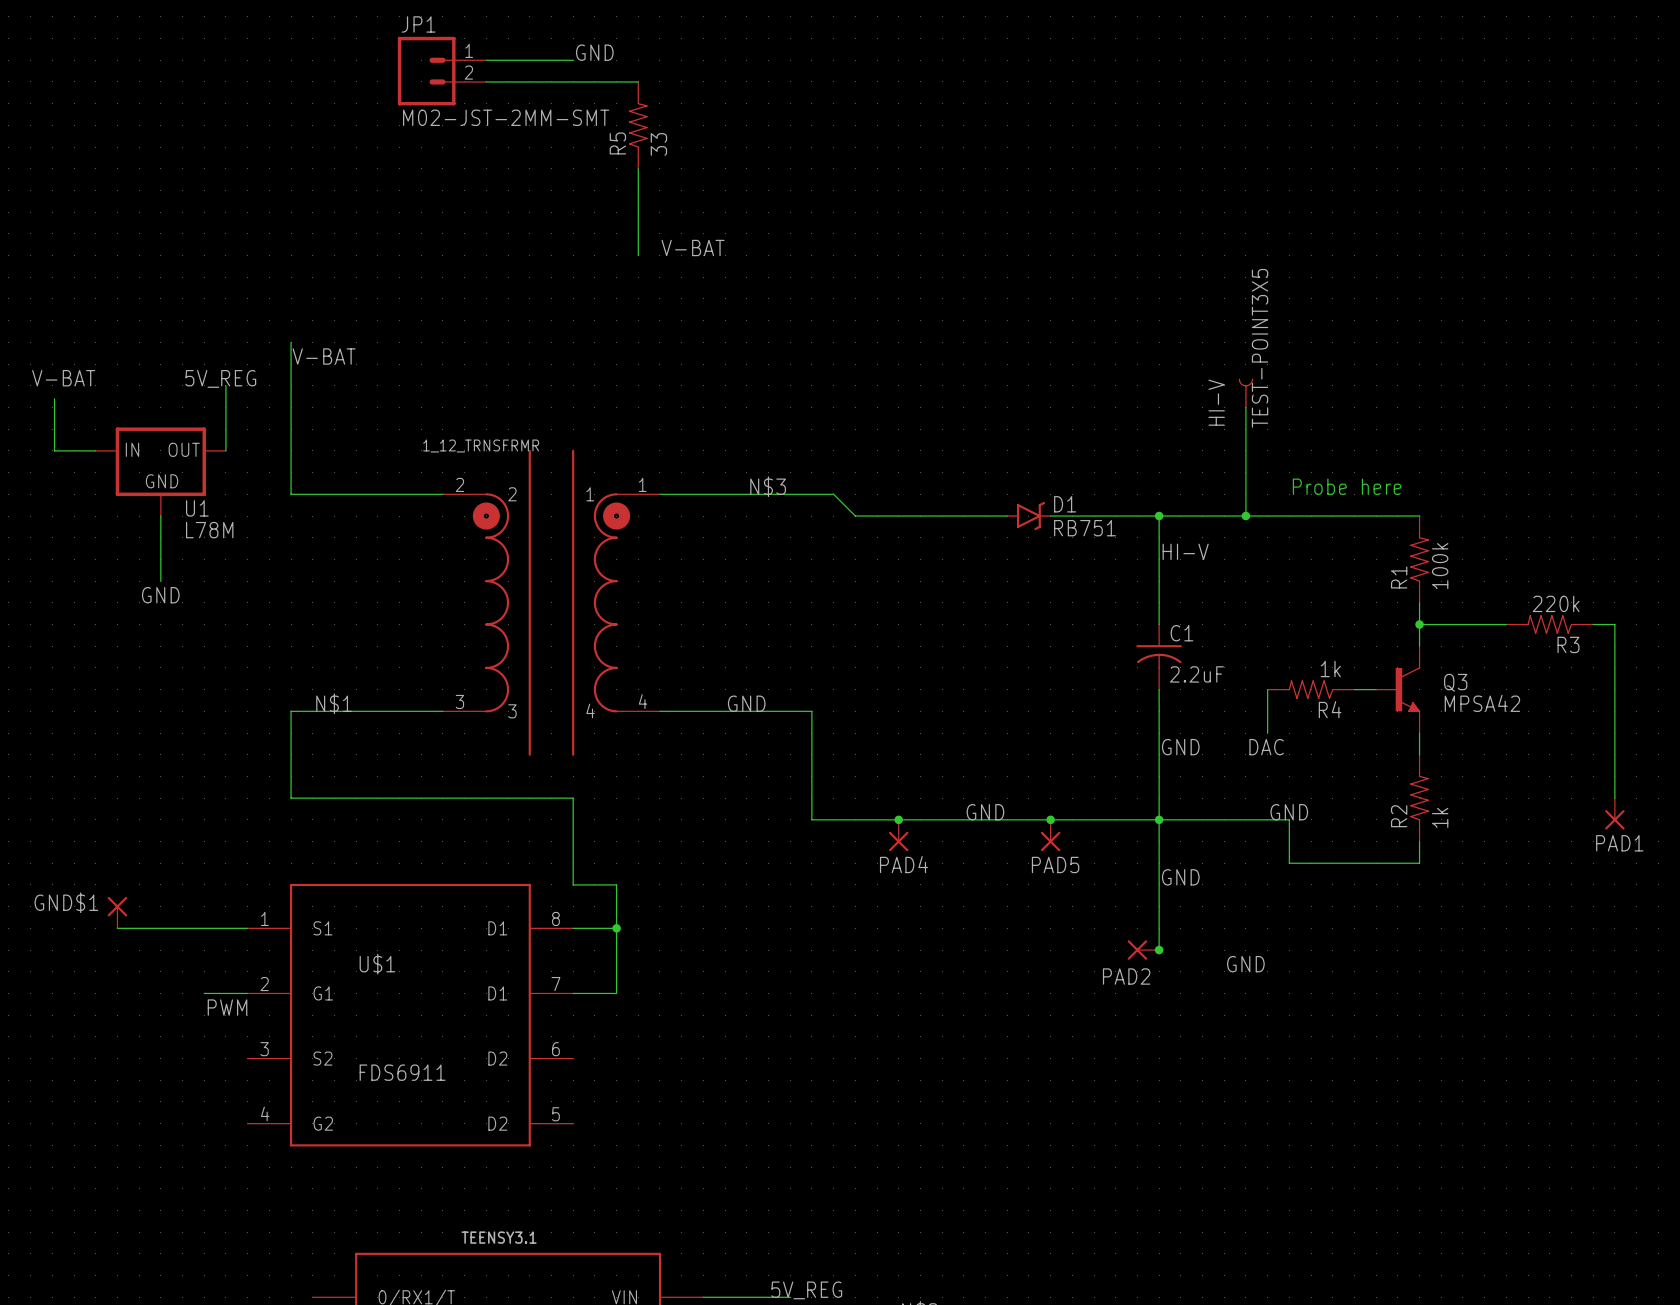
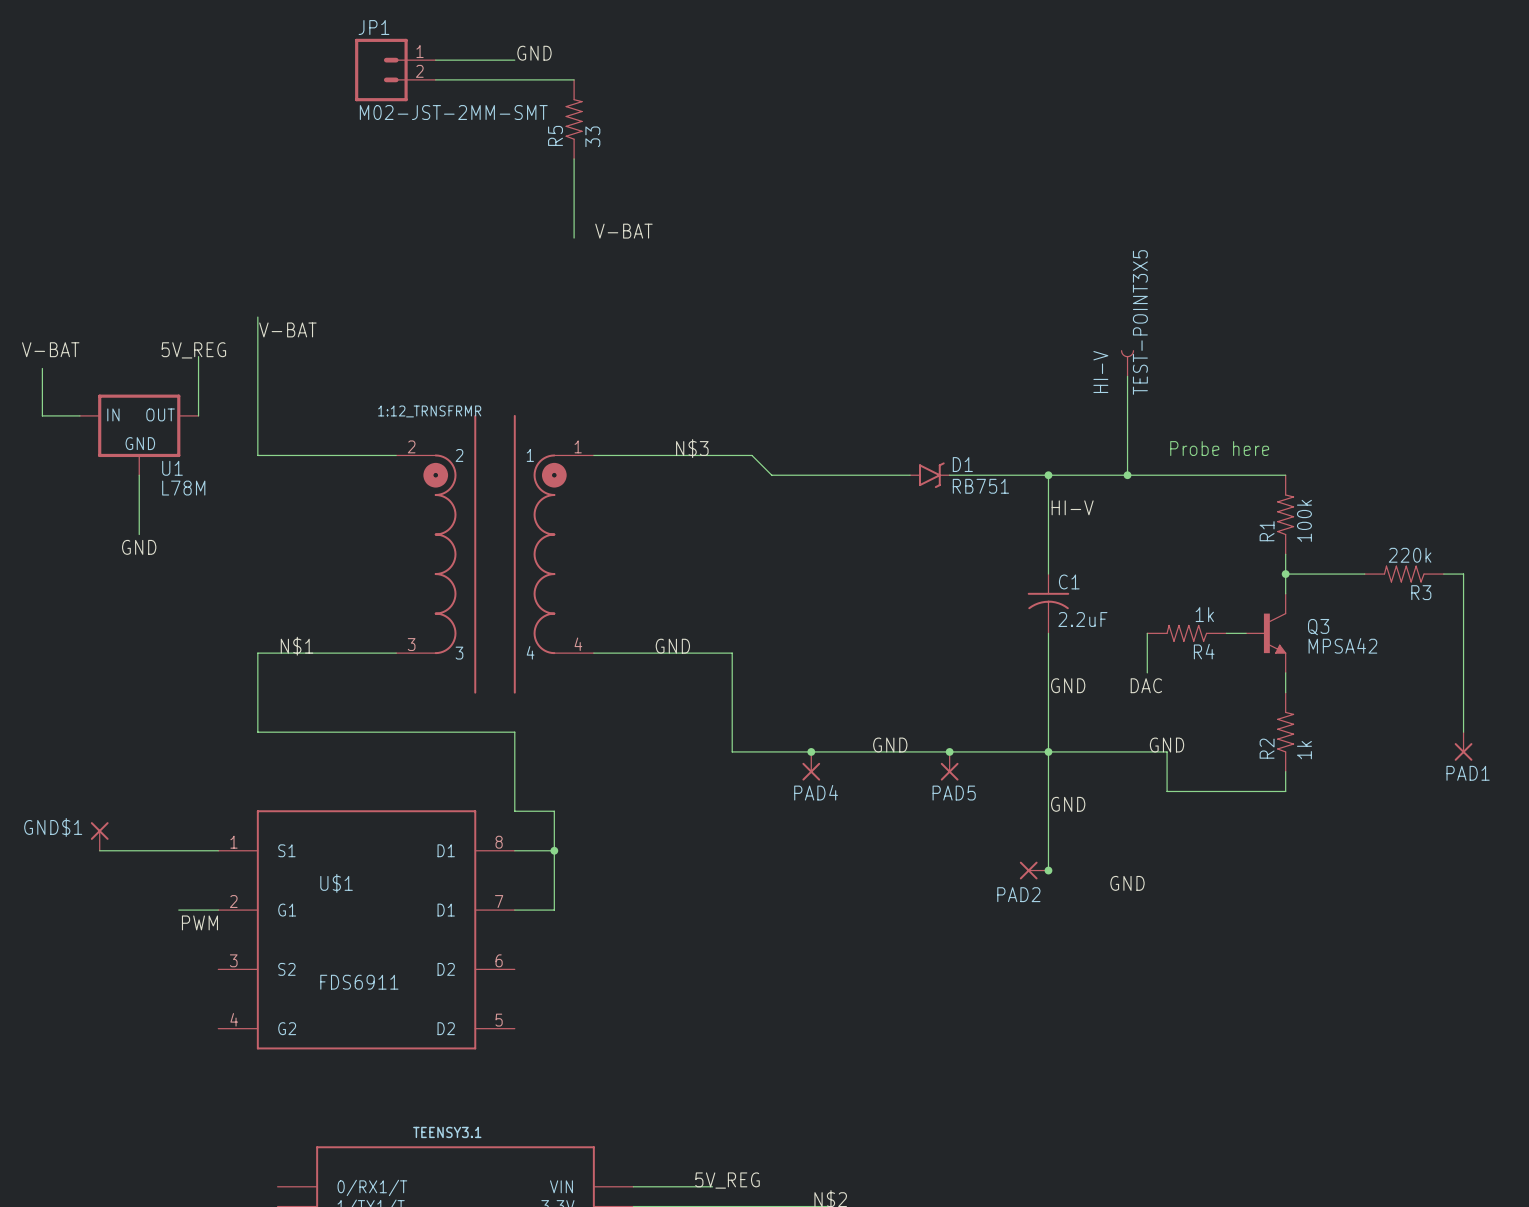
1_12_TRNSFRMR name: 1_12_TRNSFRMR (481, 446) -> 1:12_TRNSFRMR (429, 411)

